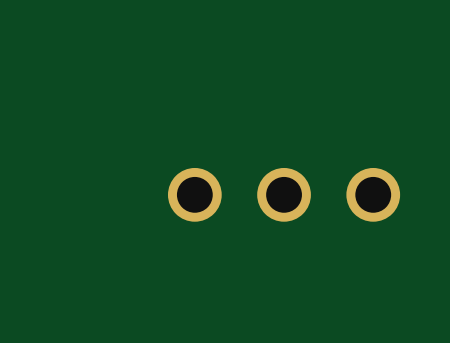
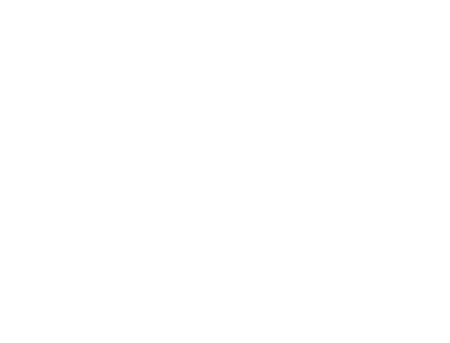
part: (284, 194) -> none

